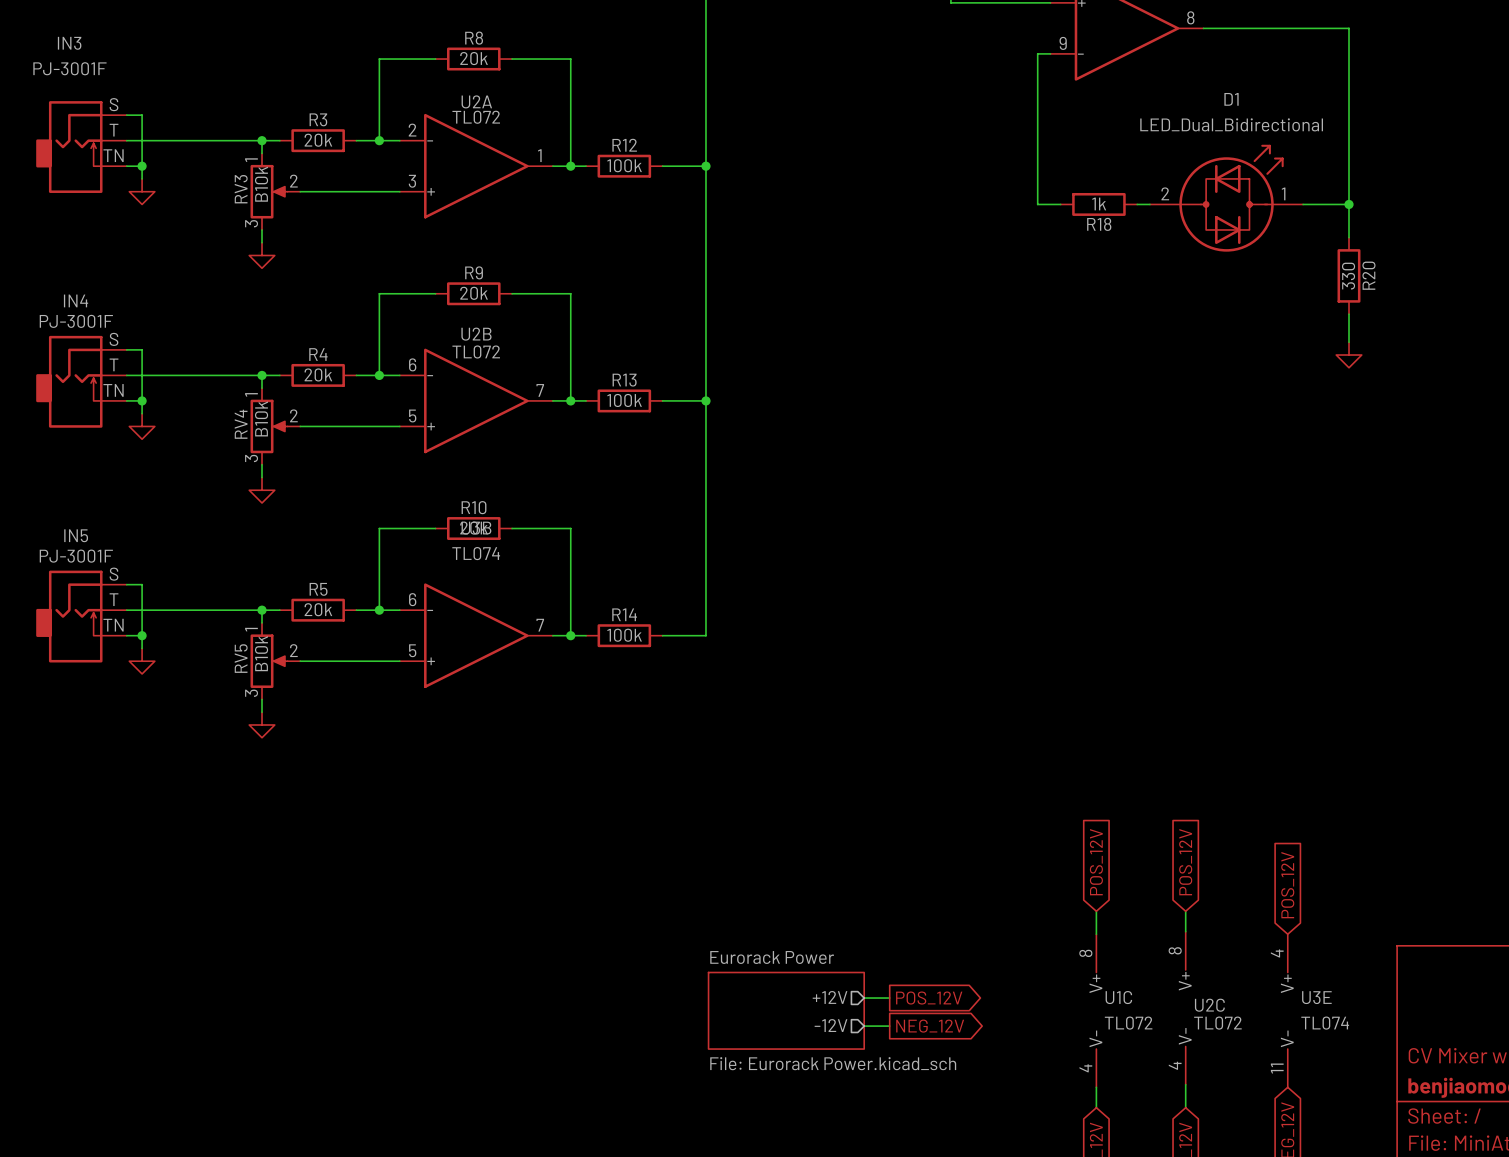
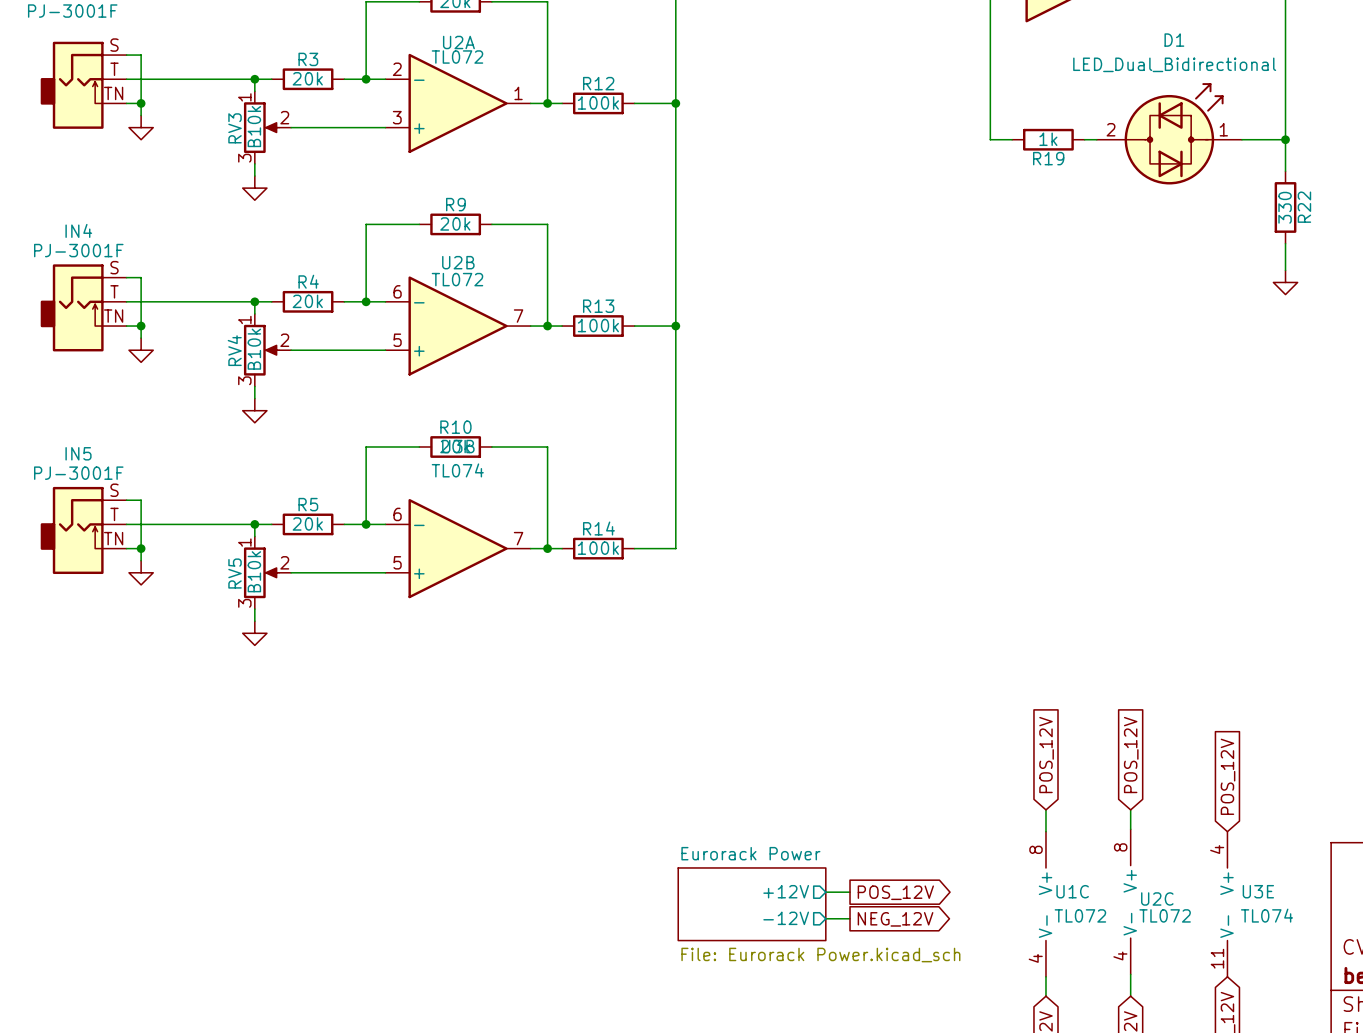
R18 name: R18 (1099, 224) -> R19 (1048, 158)
R20 name: R20 (1368, 275) -> R22 (1304, 207)

